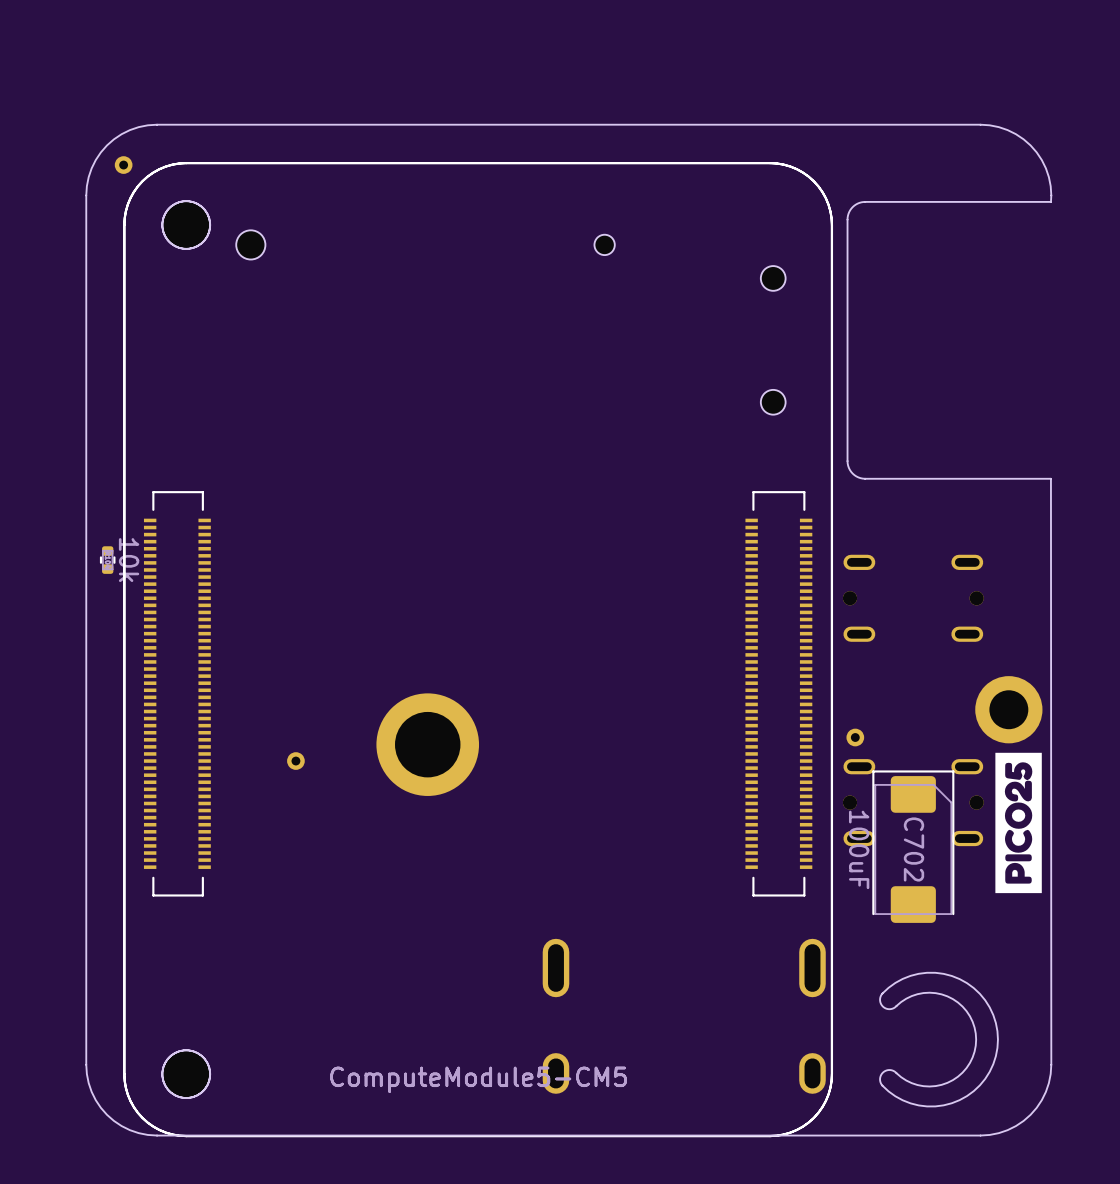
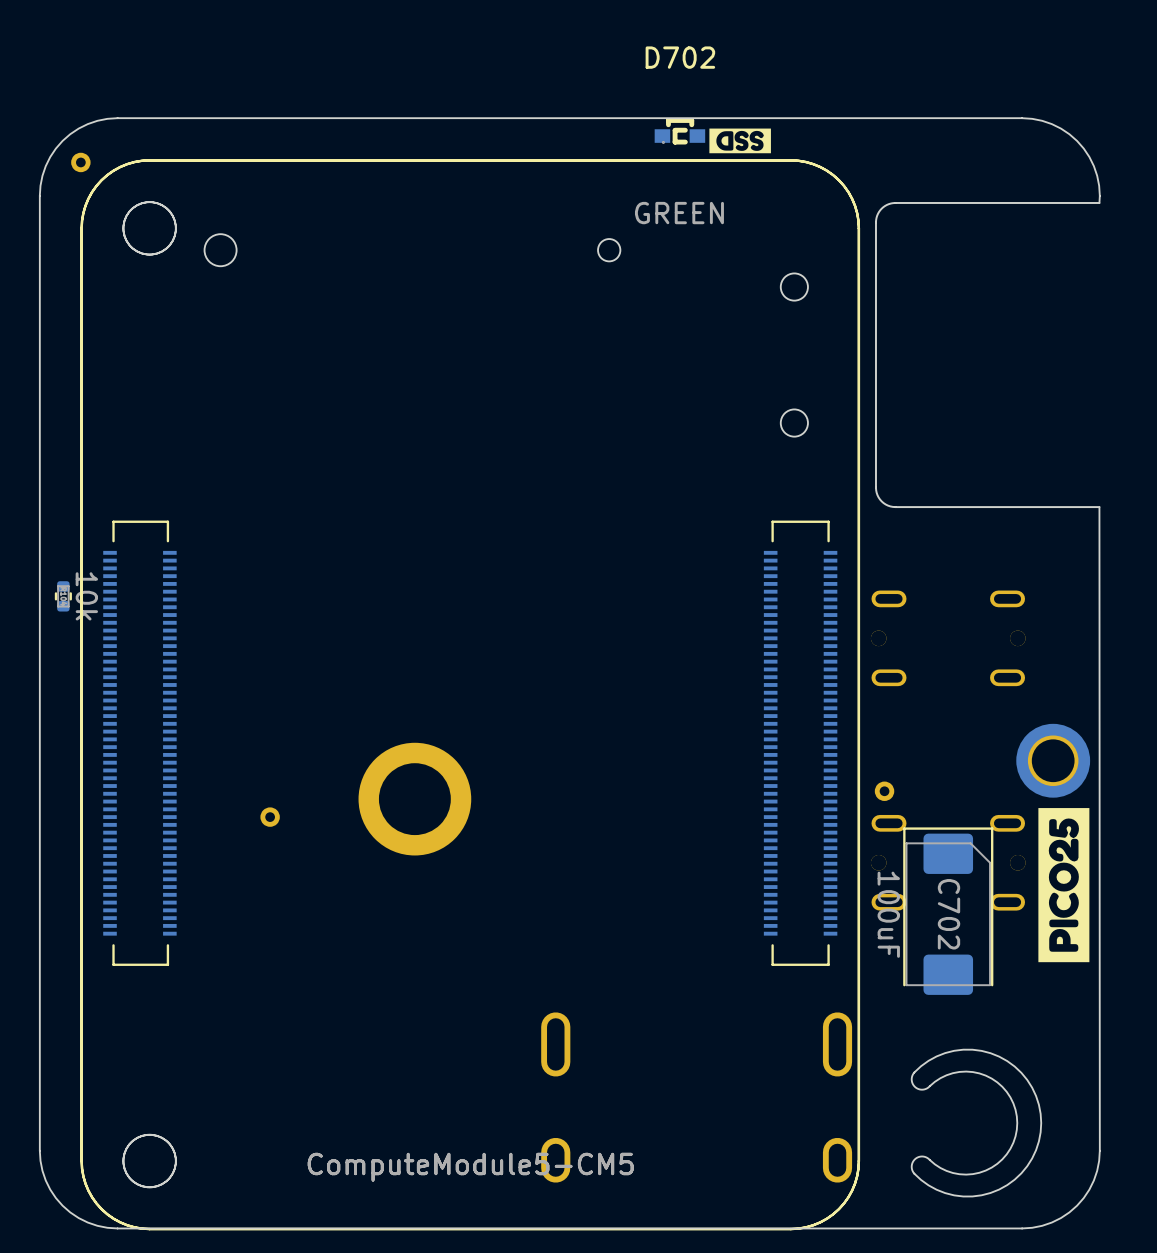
drawing: none -> [709, 128, 771, 154]
D702: none -> GREEN (679, 131)

